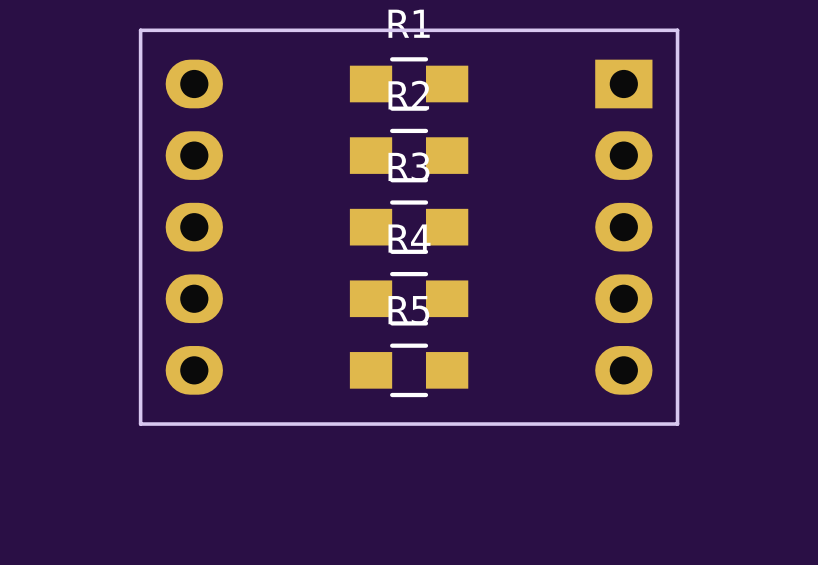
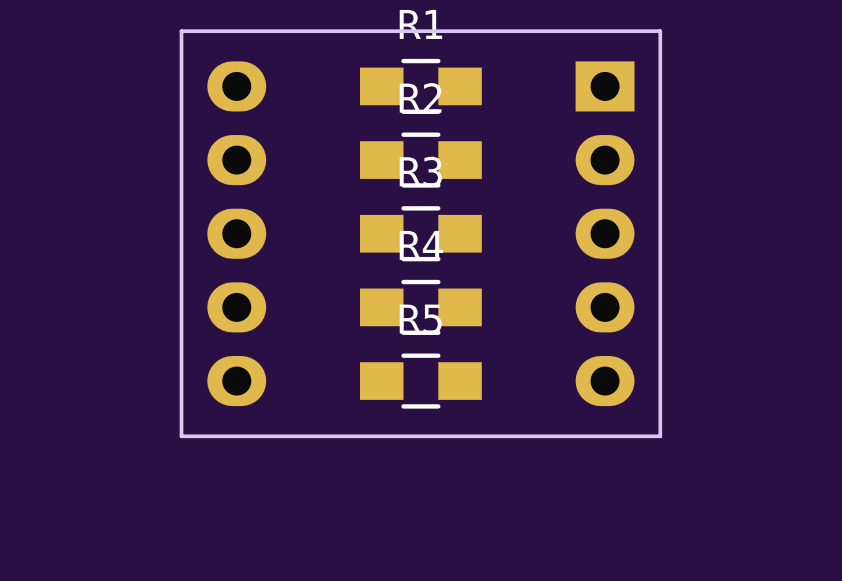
board edge: (176, 30) (140, 30) (140, 424) (176, 424) -> (181, 31) (181, 436)
board edge: (641, 30) (677, 30) (677, 424) (641, 424) -> (660, 31) (660, 436)
part position: (194, 227) -> (236, 233)
part position: (623, 227) -> (605, 233)

